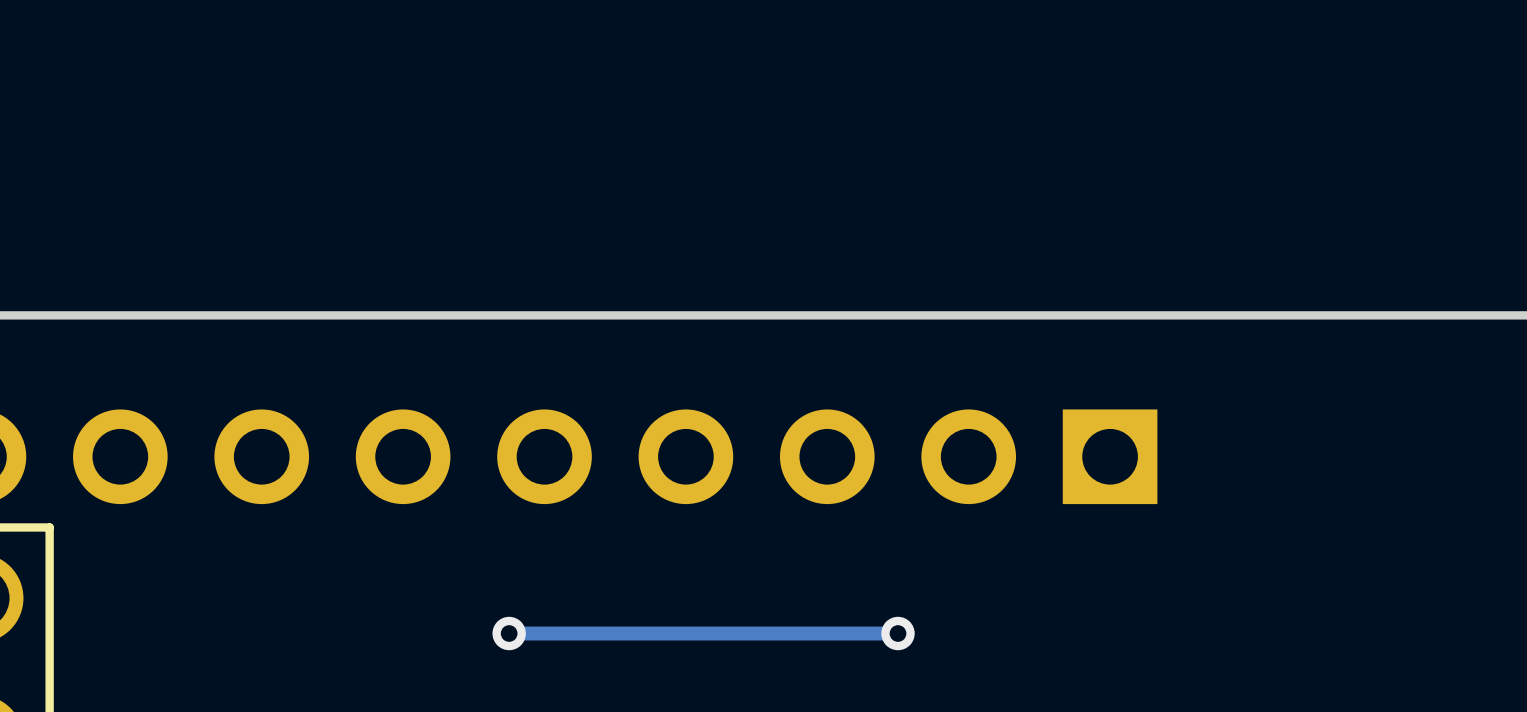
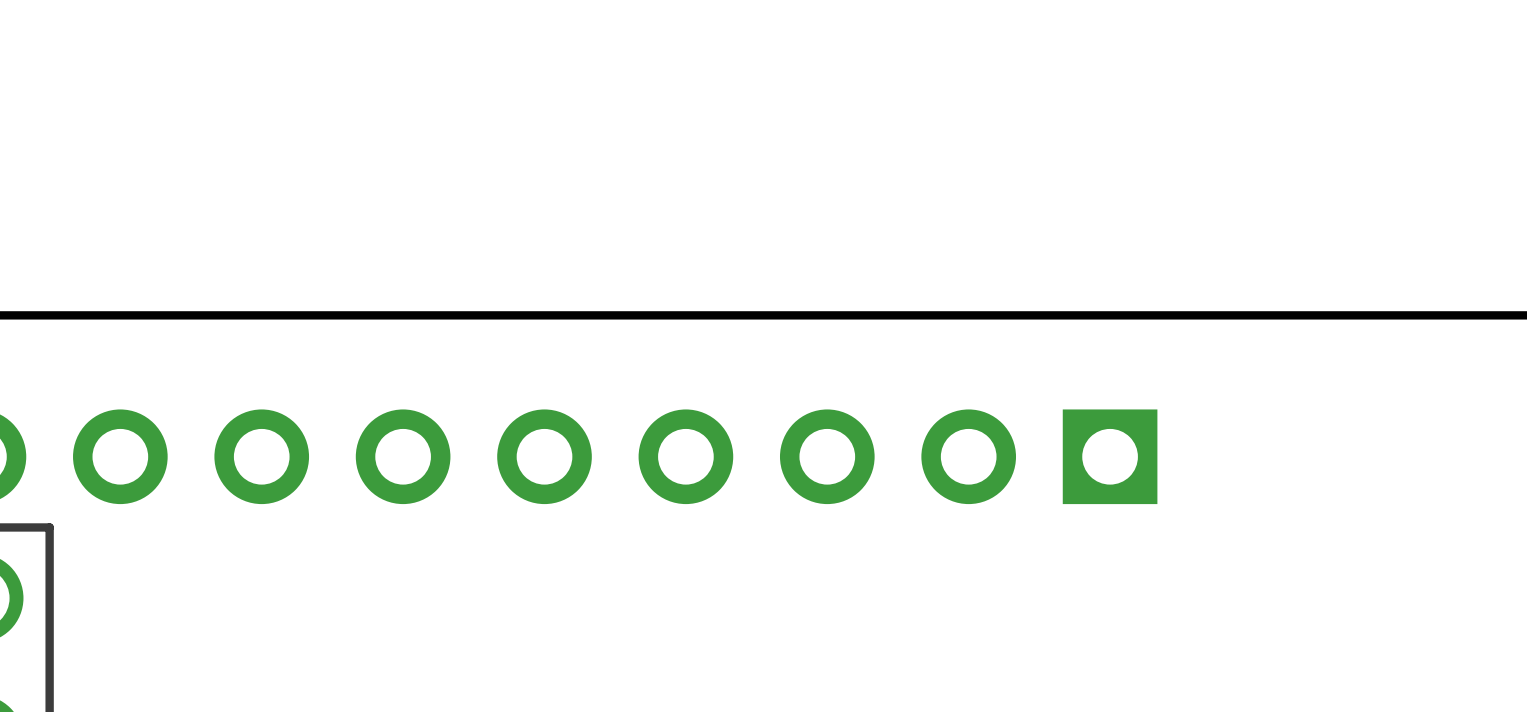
via: (509, 633) -> none
track: (897, 633) (509, 633) -> none
via: (897, 633) -> none

